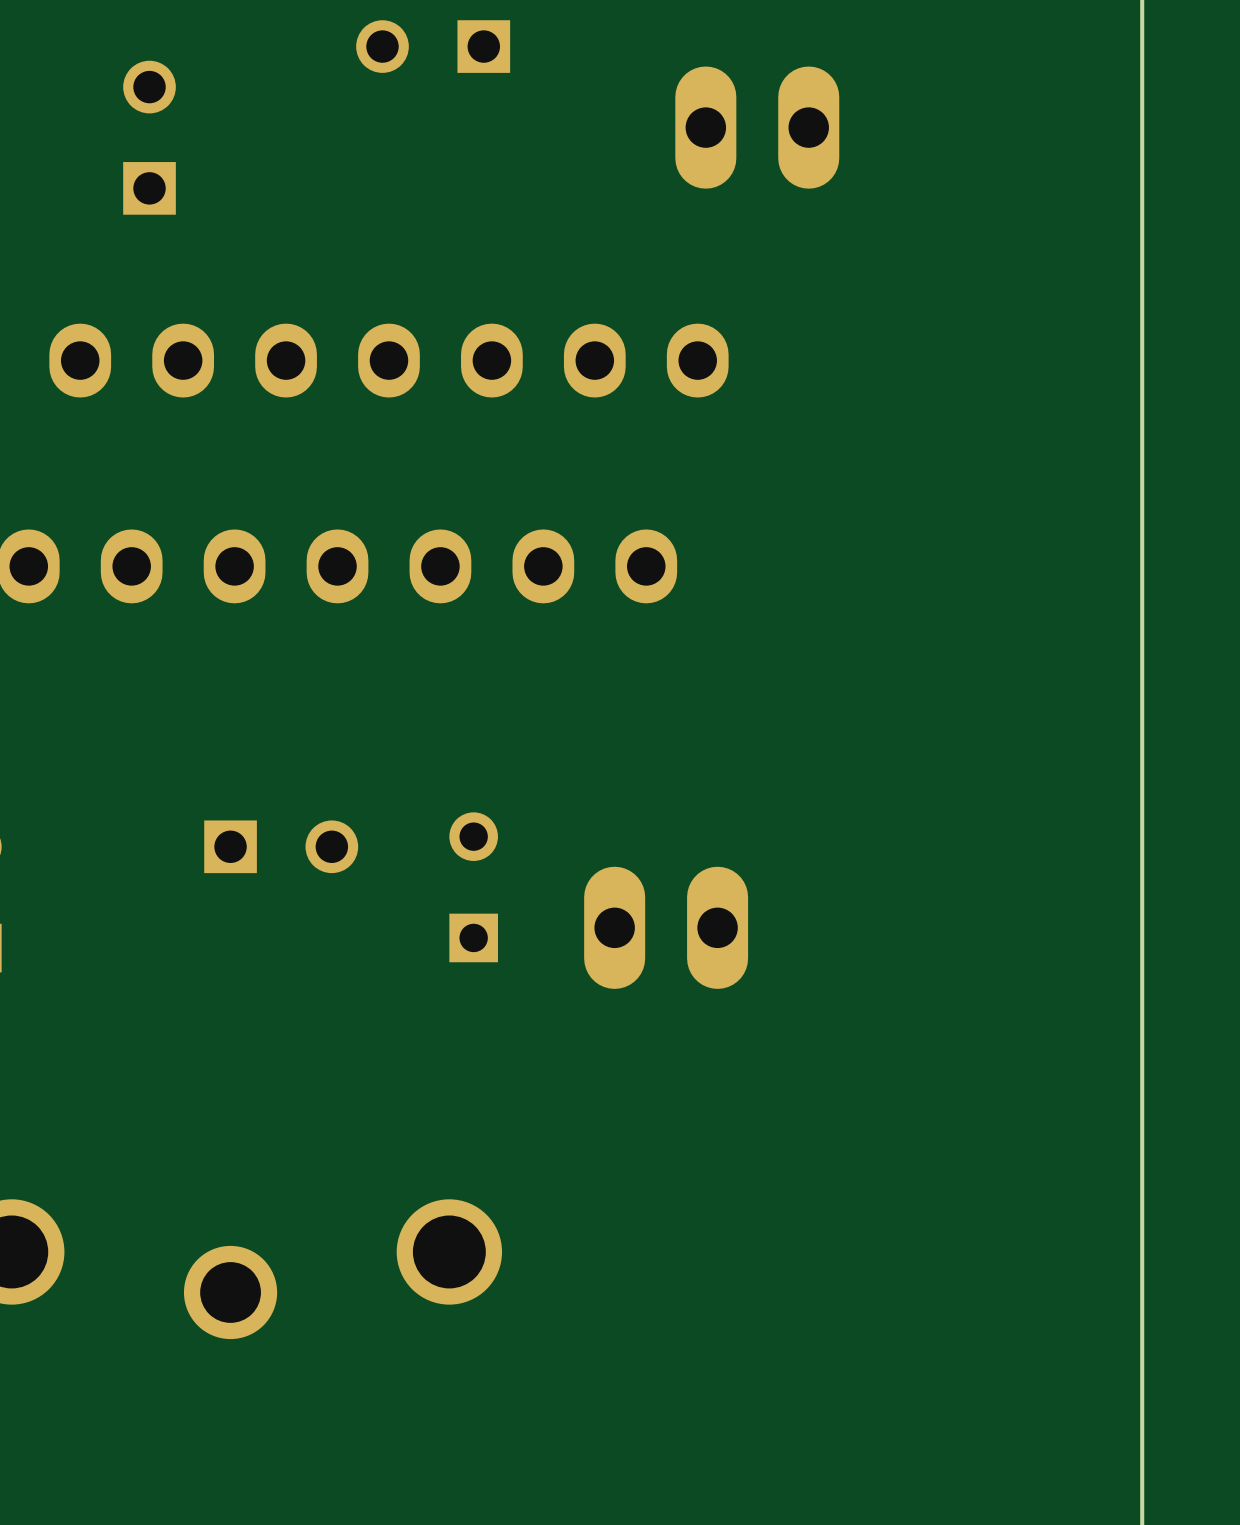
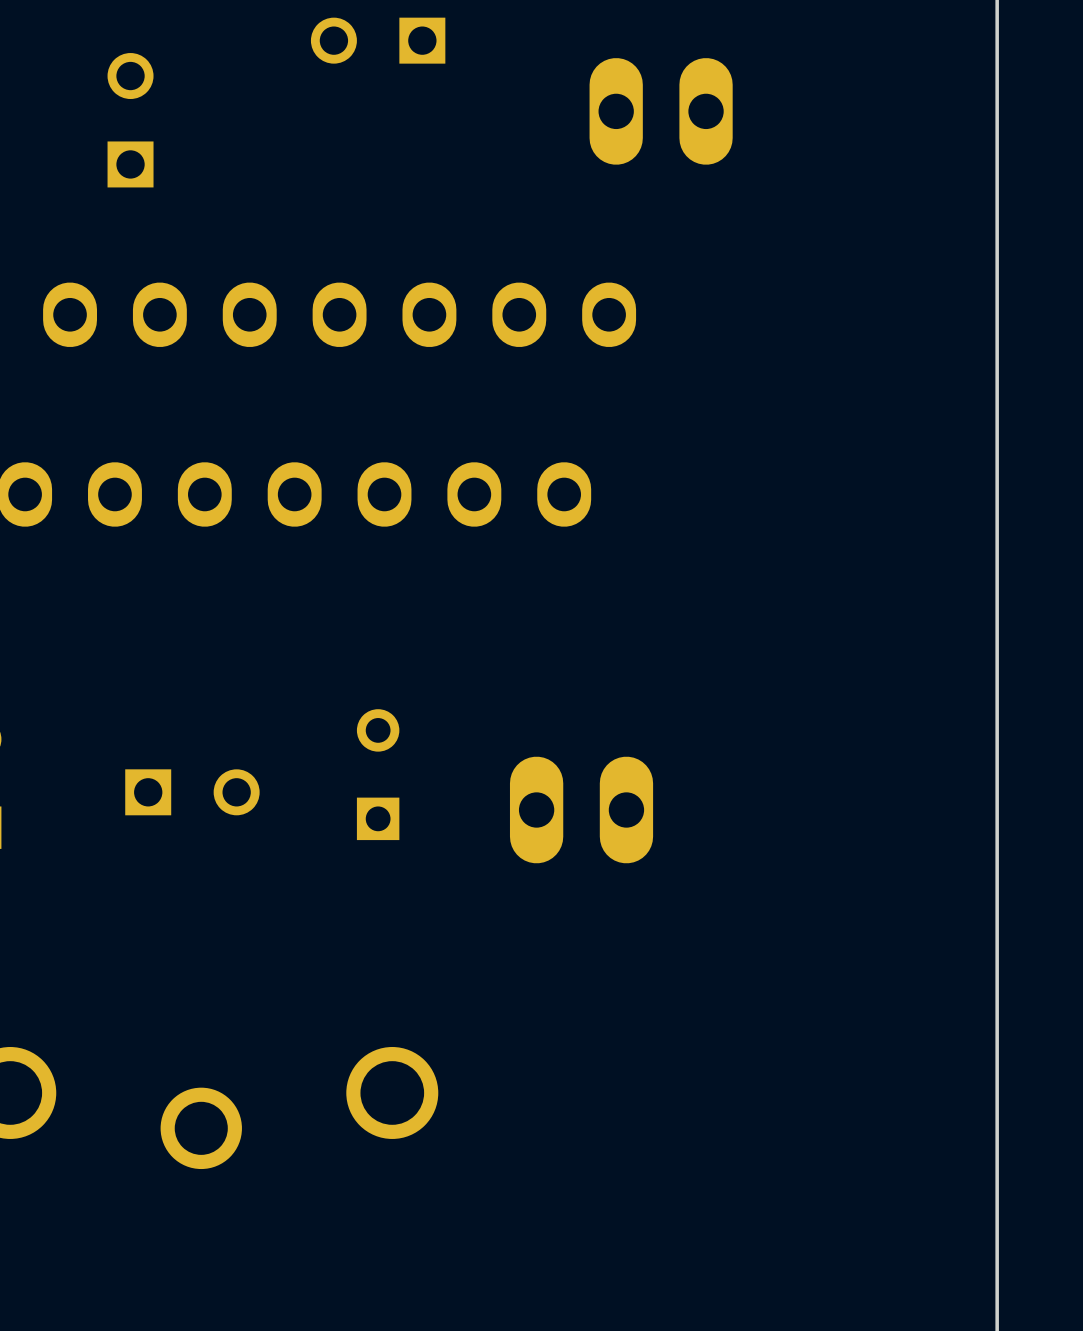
part position: (281, 846) -> (192, 792)
part position: (473, 887) -> (378, 774)

